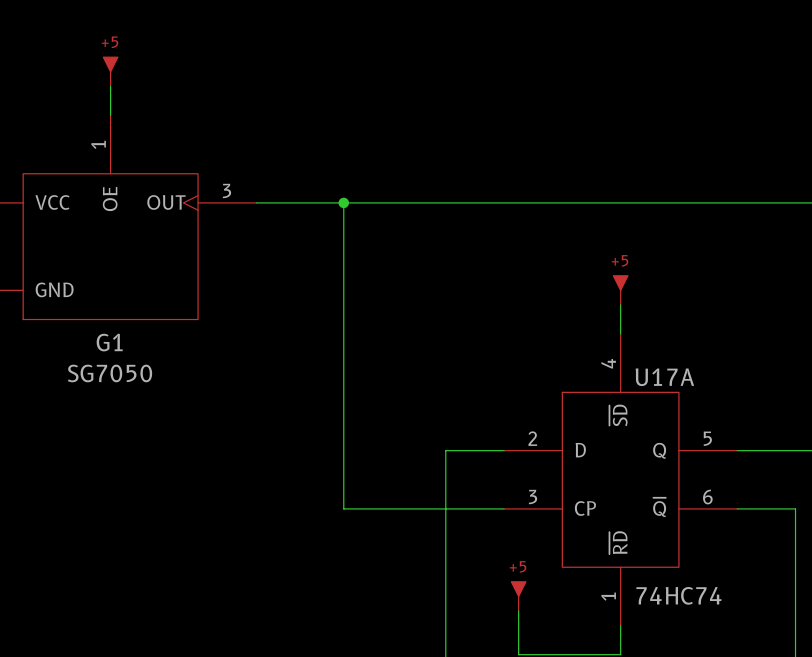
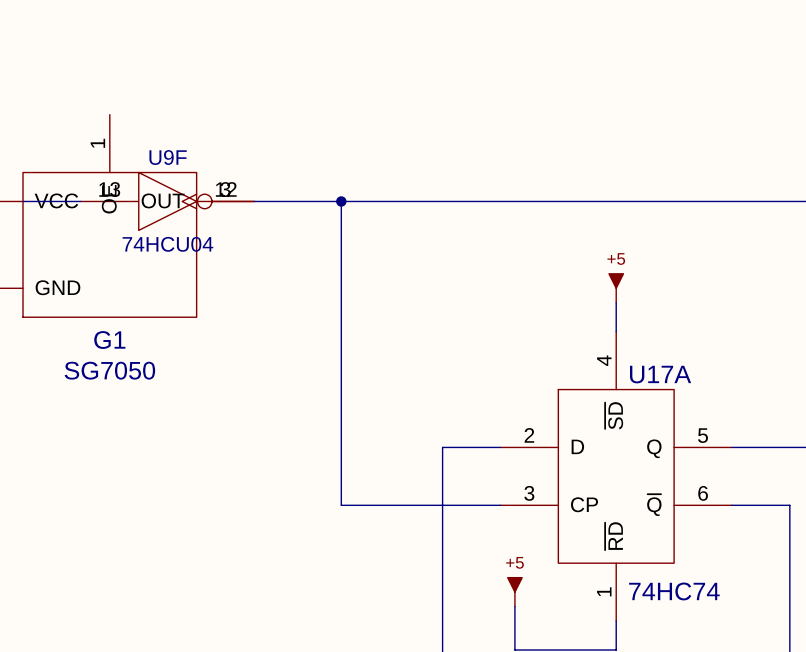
power symbol: (110, 71) -> none
wire: (110, 86) (110, 115) -> none
wire: none -> (23, 201) (80, 201)
U9F: none -> 74HCU04 (167, 201)

